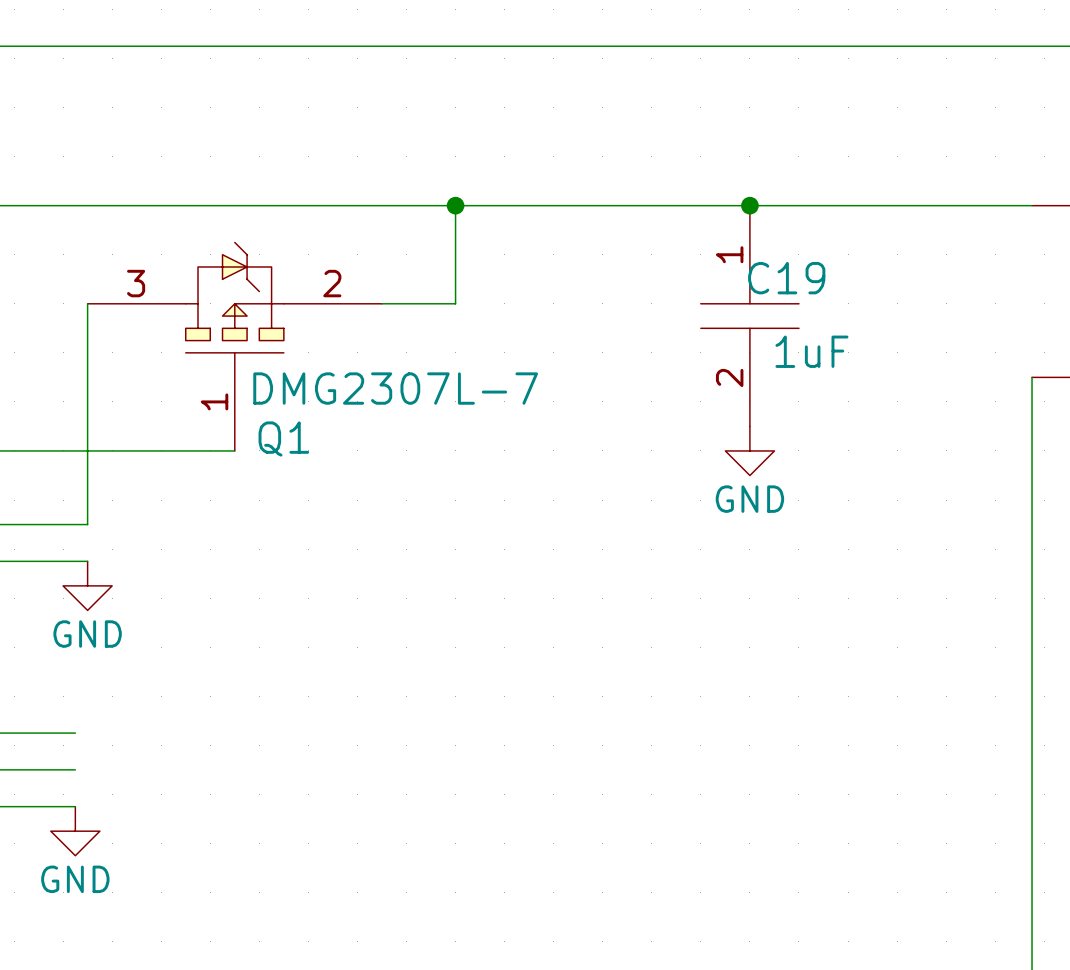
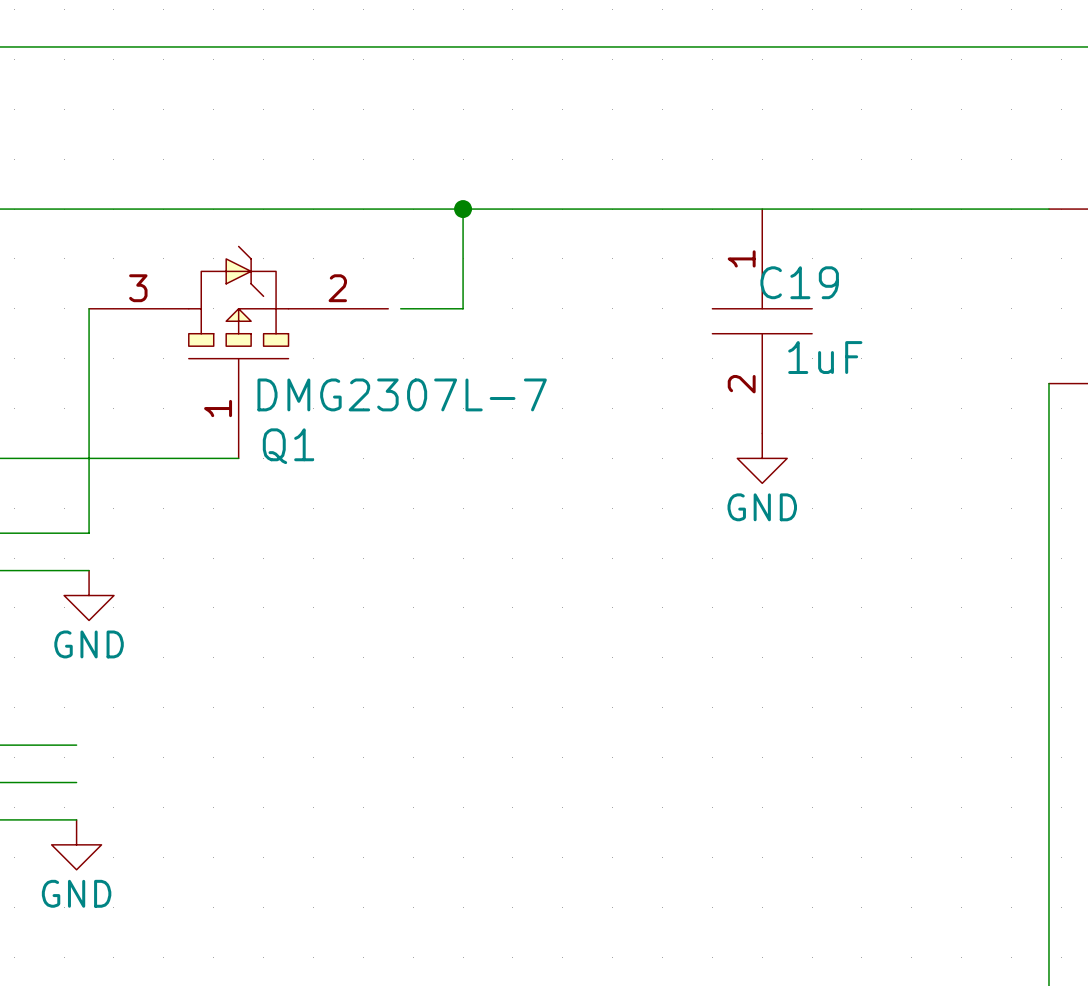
junction: (749, 205) -> none
wire: (381, 303) (394, 303) -> none

